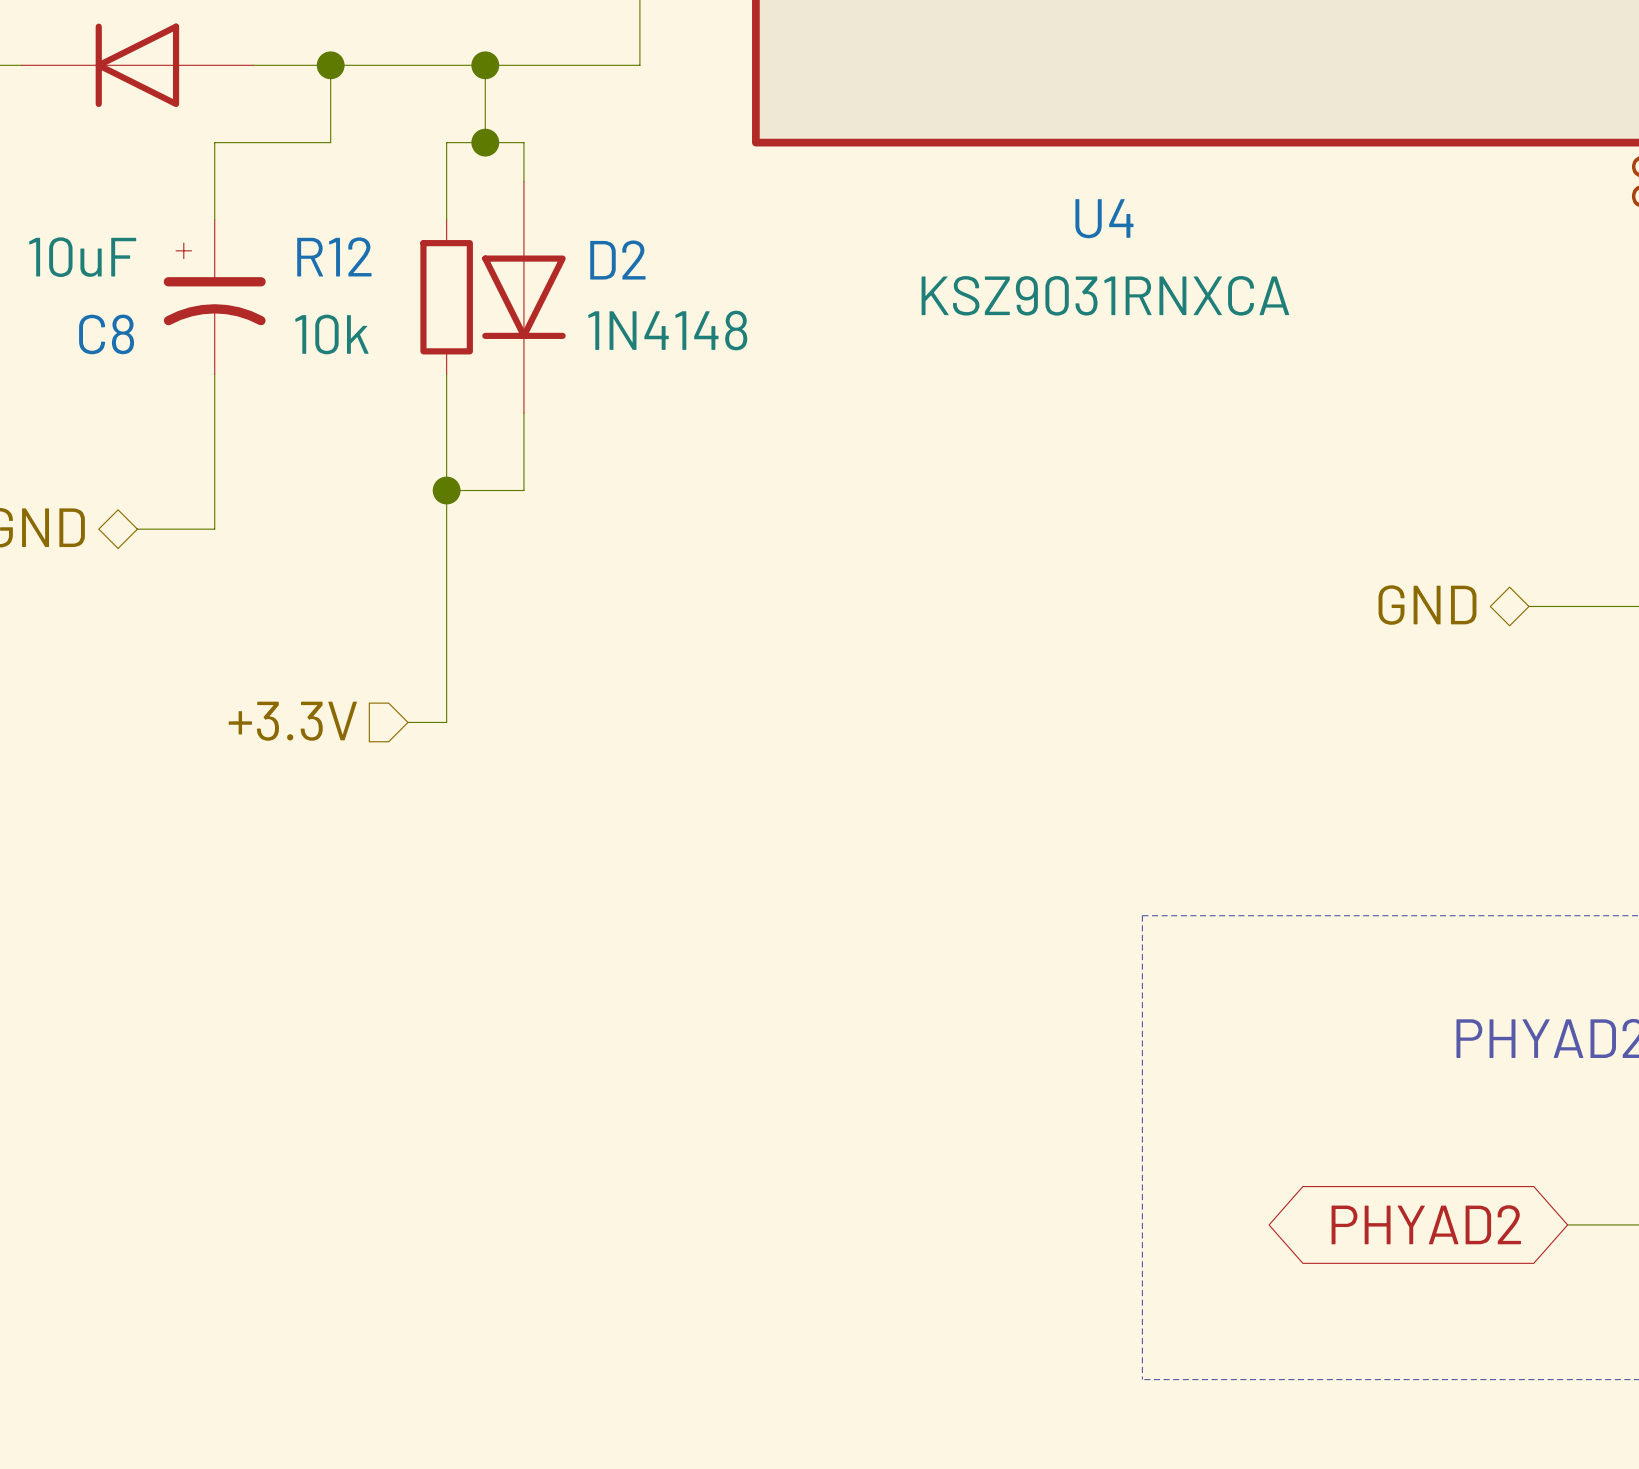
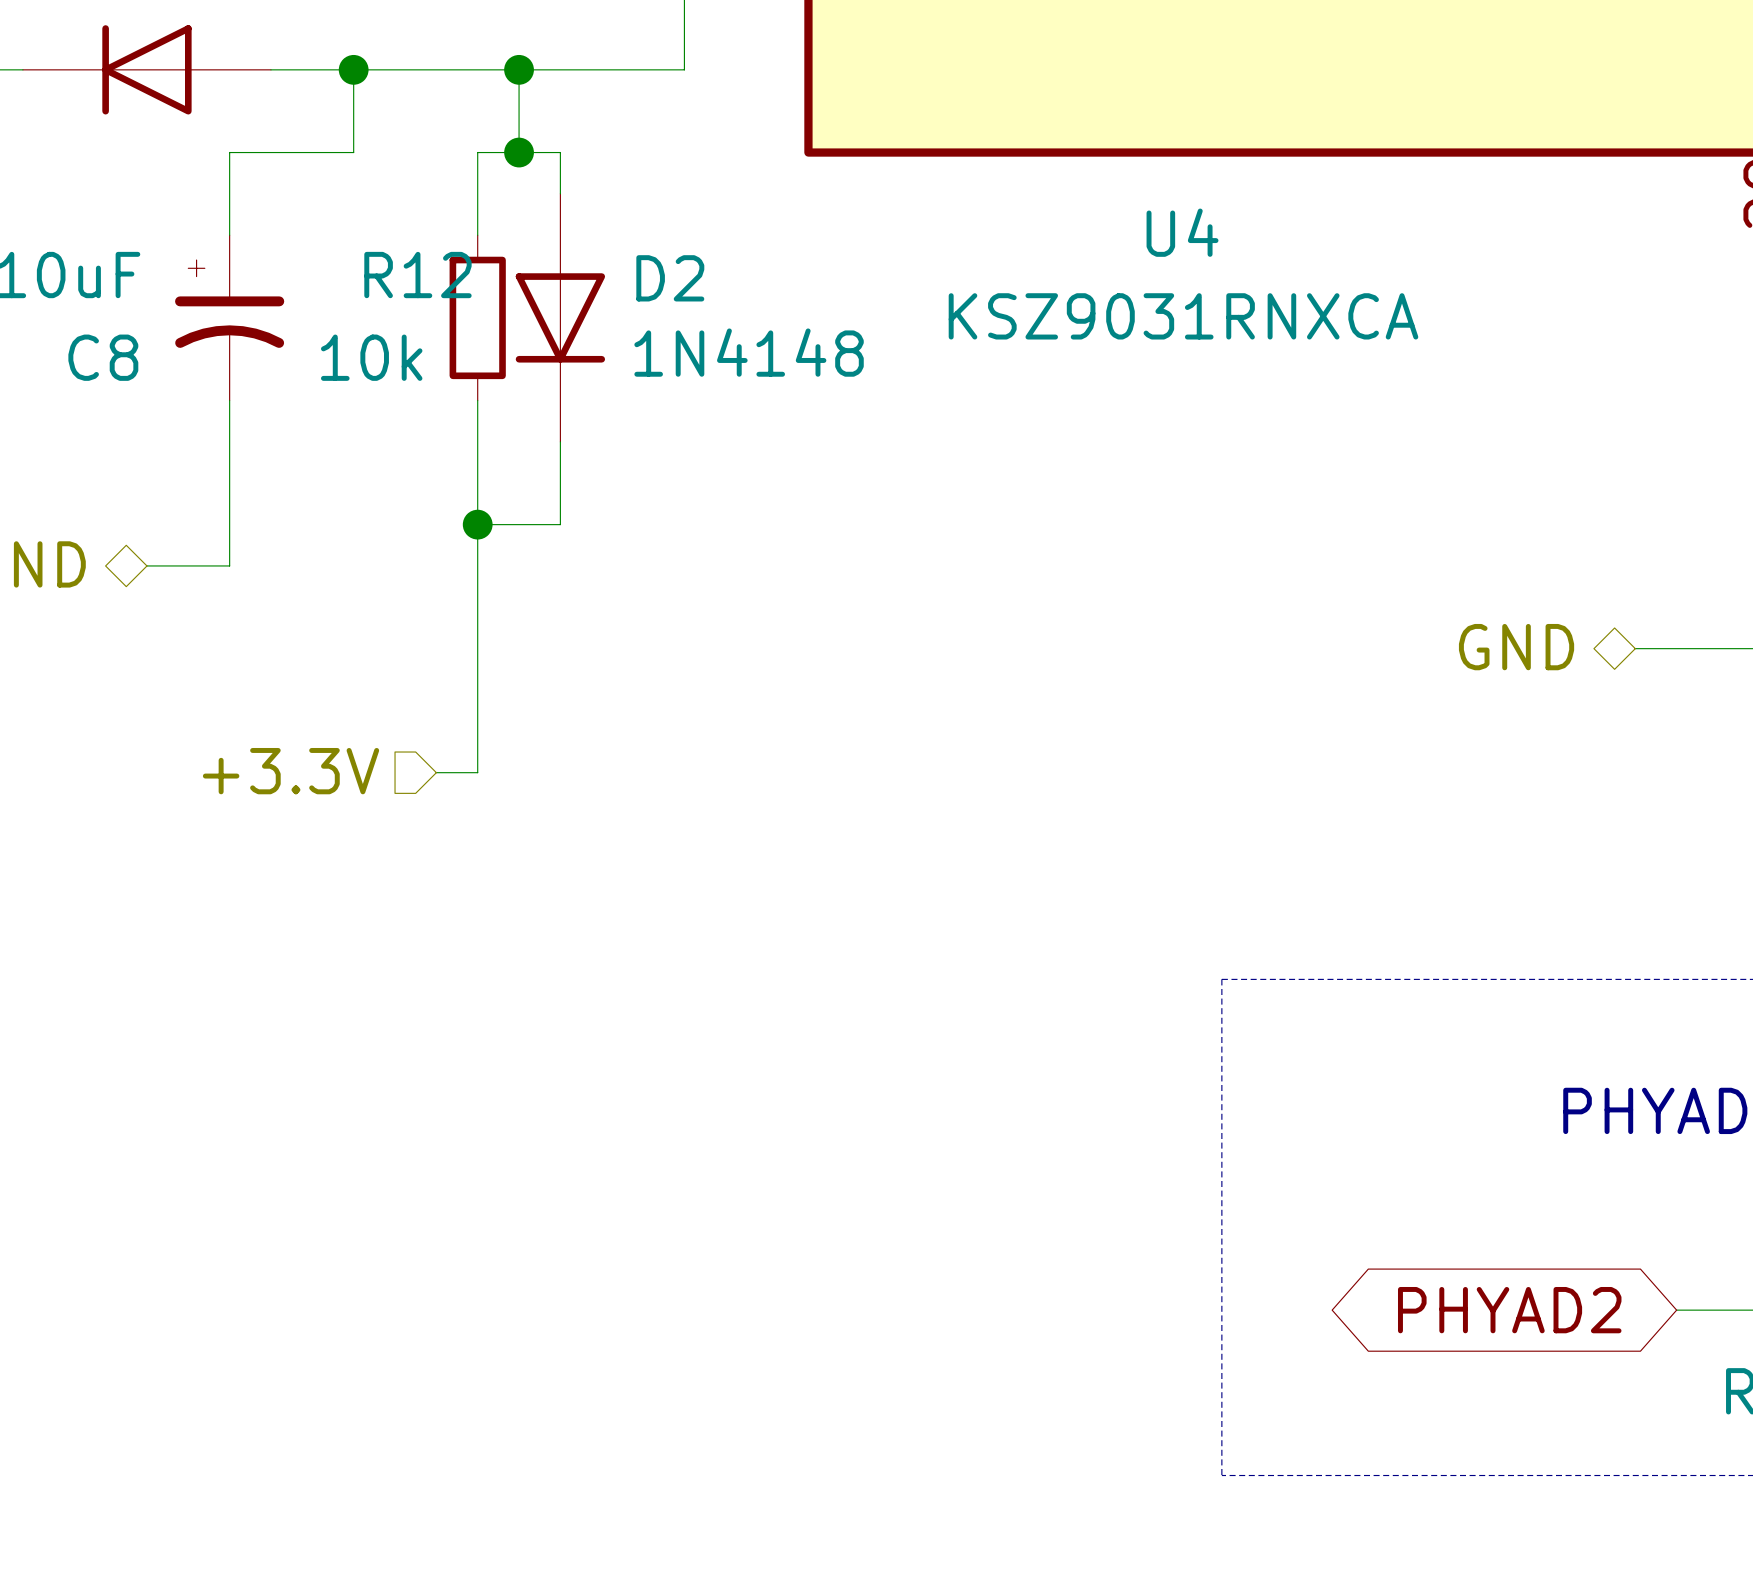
R12 name position: R12 (334, 256) -> R12 (417, 275)

